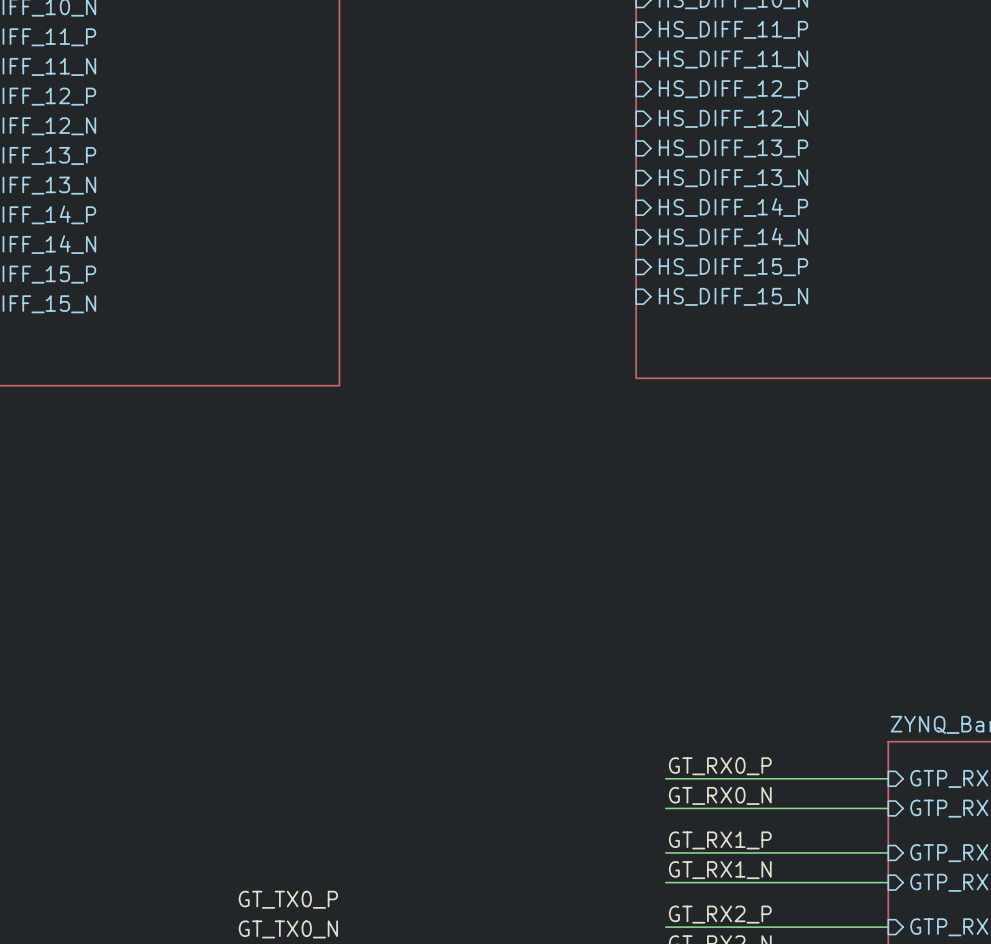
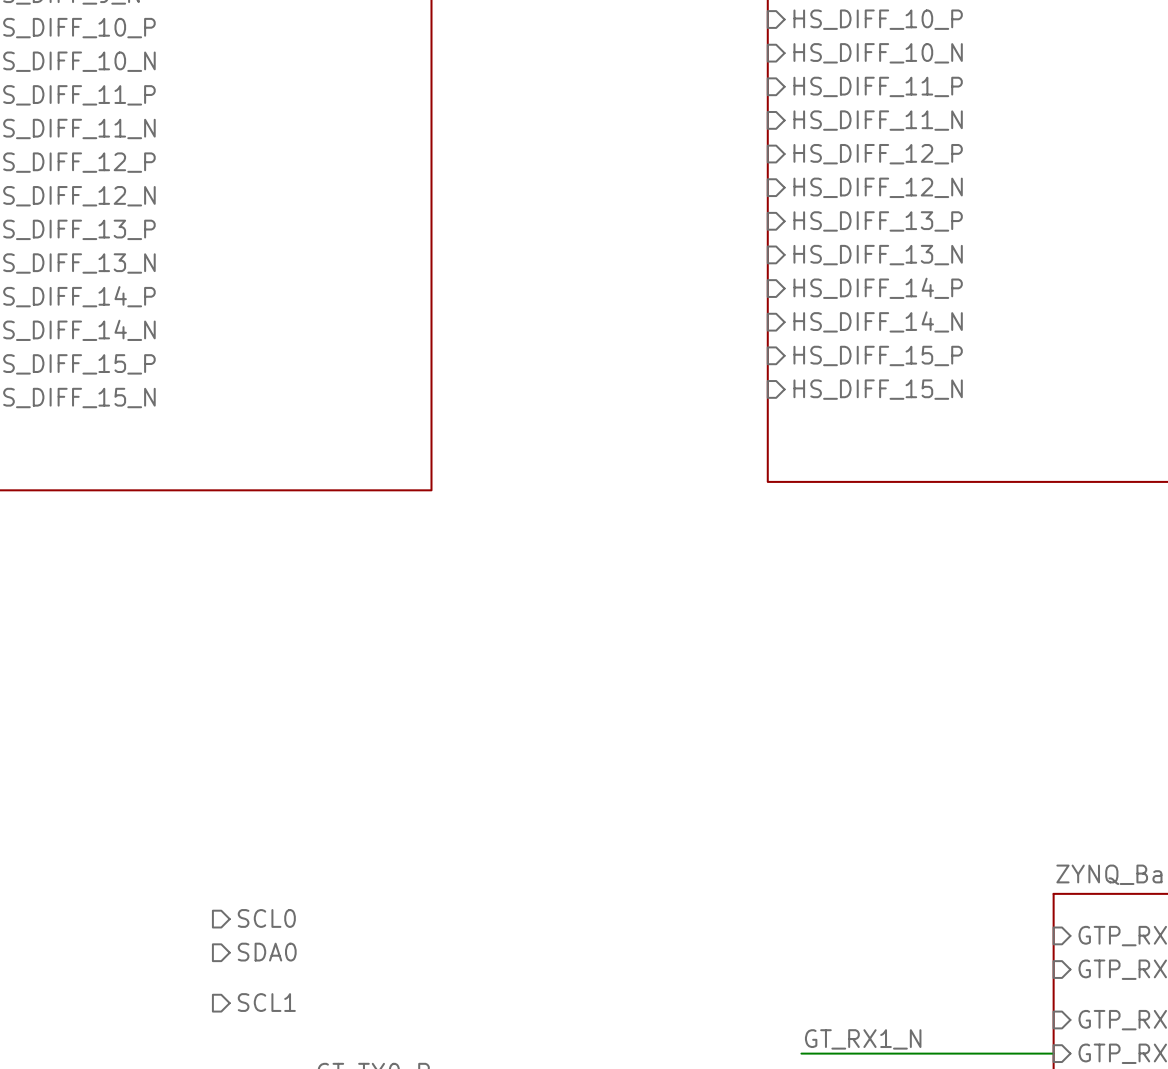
sheet pin: none -> SCL0 (266, 918)
label: GT_RX0_P (720, 766) -> none
wire: (665, 778) (888, 778) -> none
sheet pin: none -> SDA0 (267, 952)
label: GT_RX0_N (720, 795) -> none
wire: (665, 808) (888, 808) -> none
sheet pin: none -> SCL1 (266, 1002)
label: GT_RX1_P (720, 840) -> none
wire: (665, 852) (888, 852) -> none

